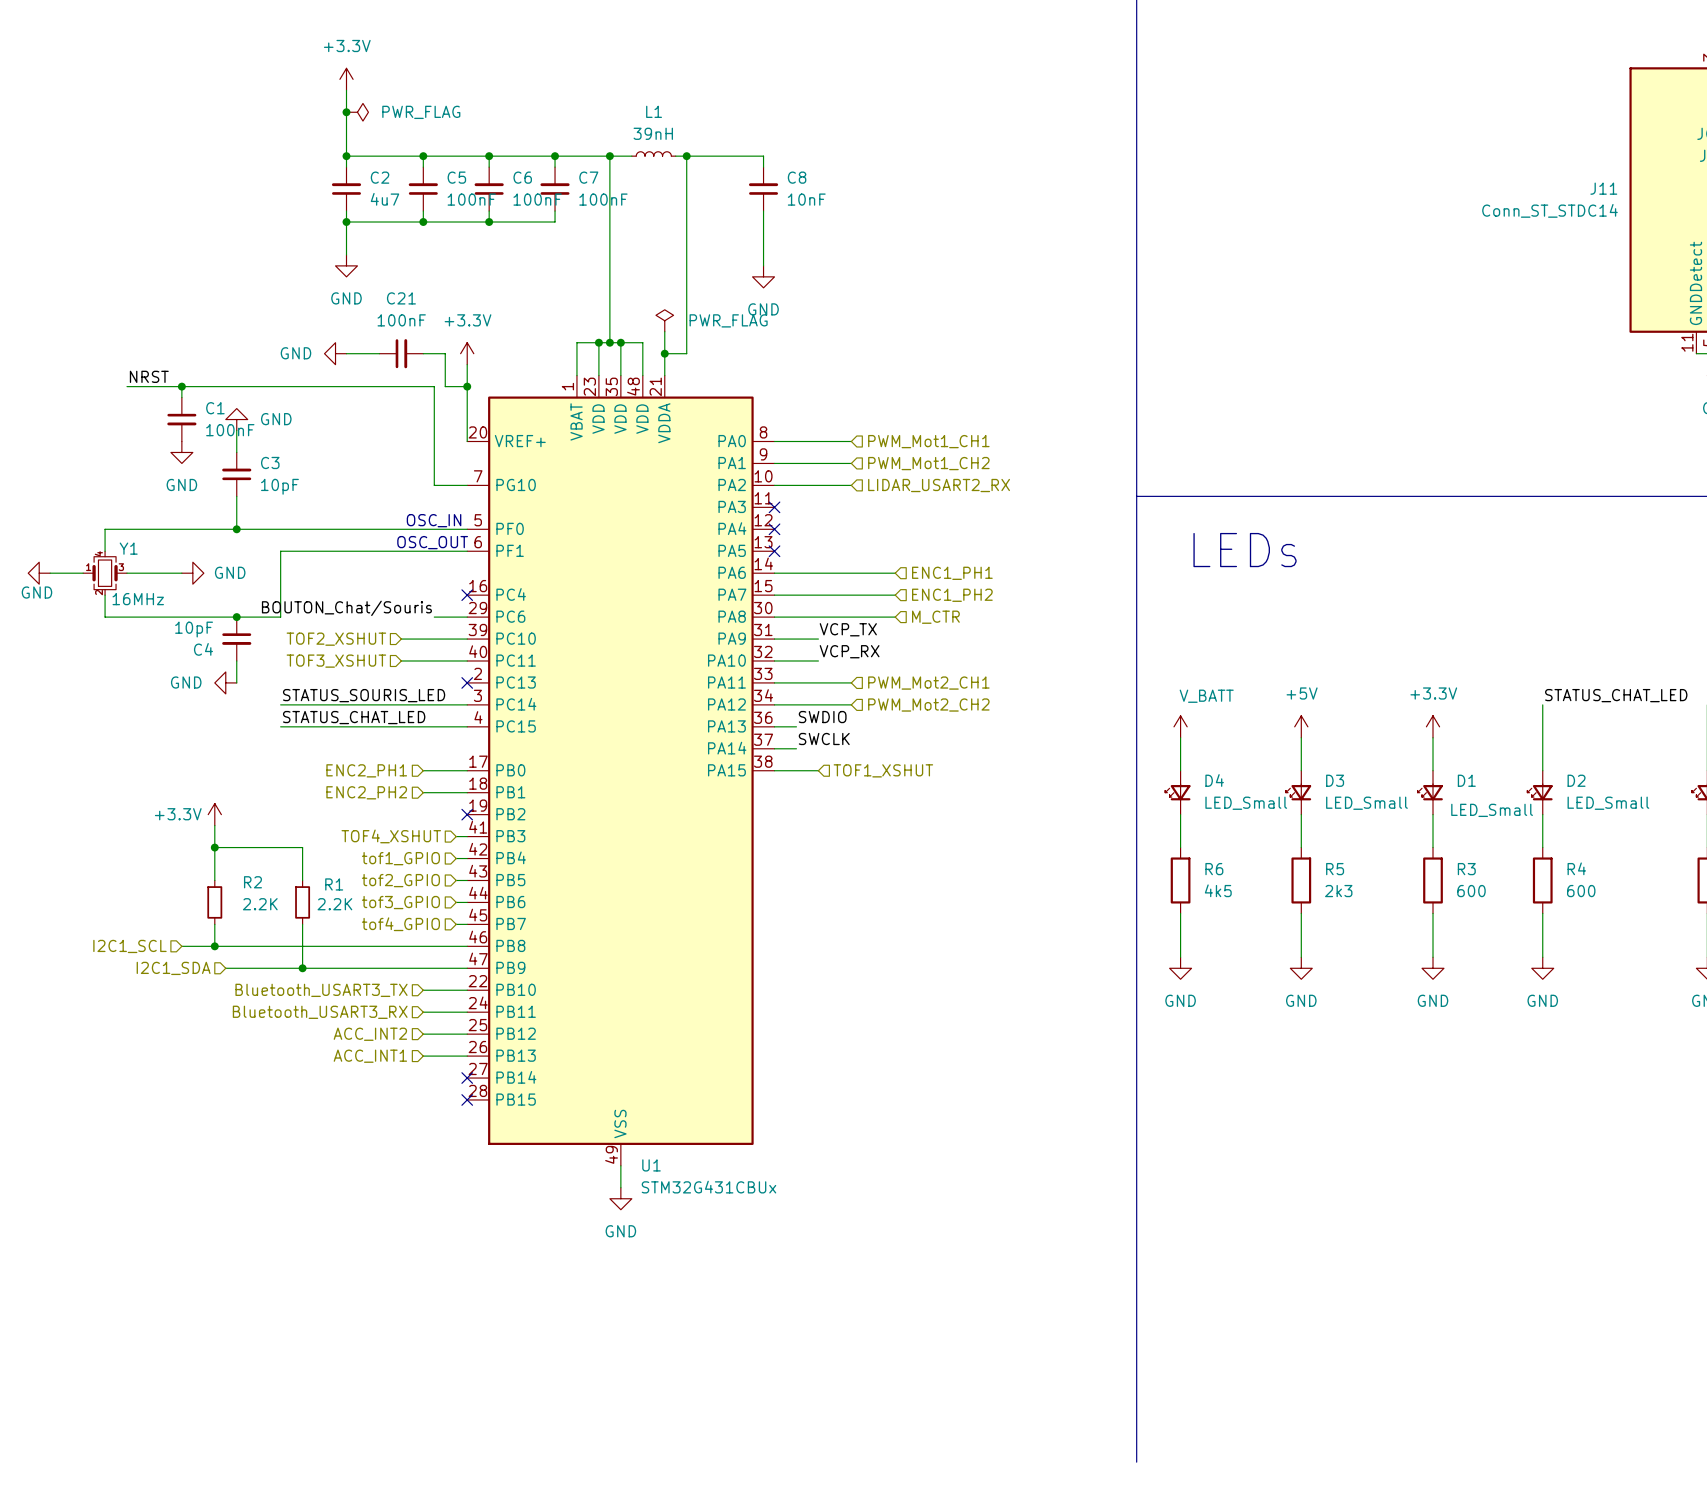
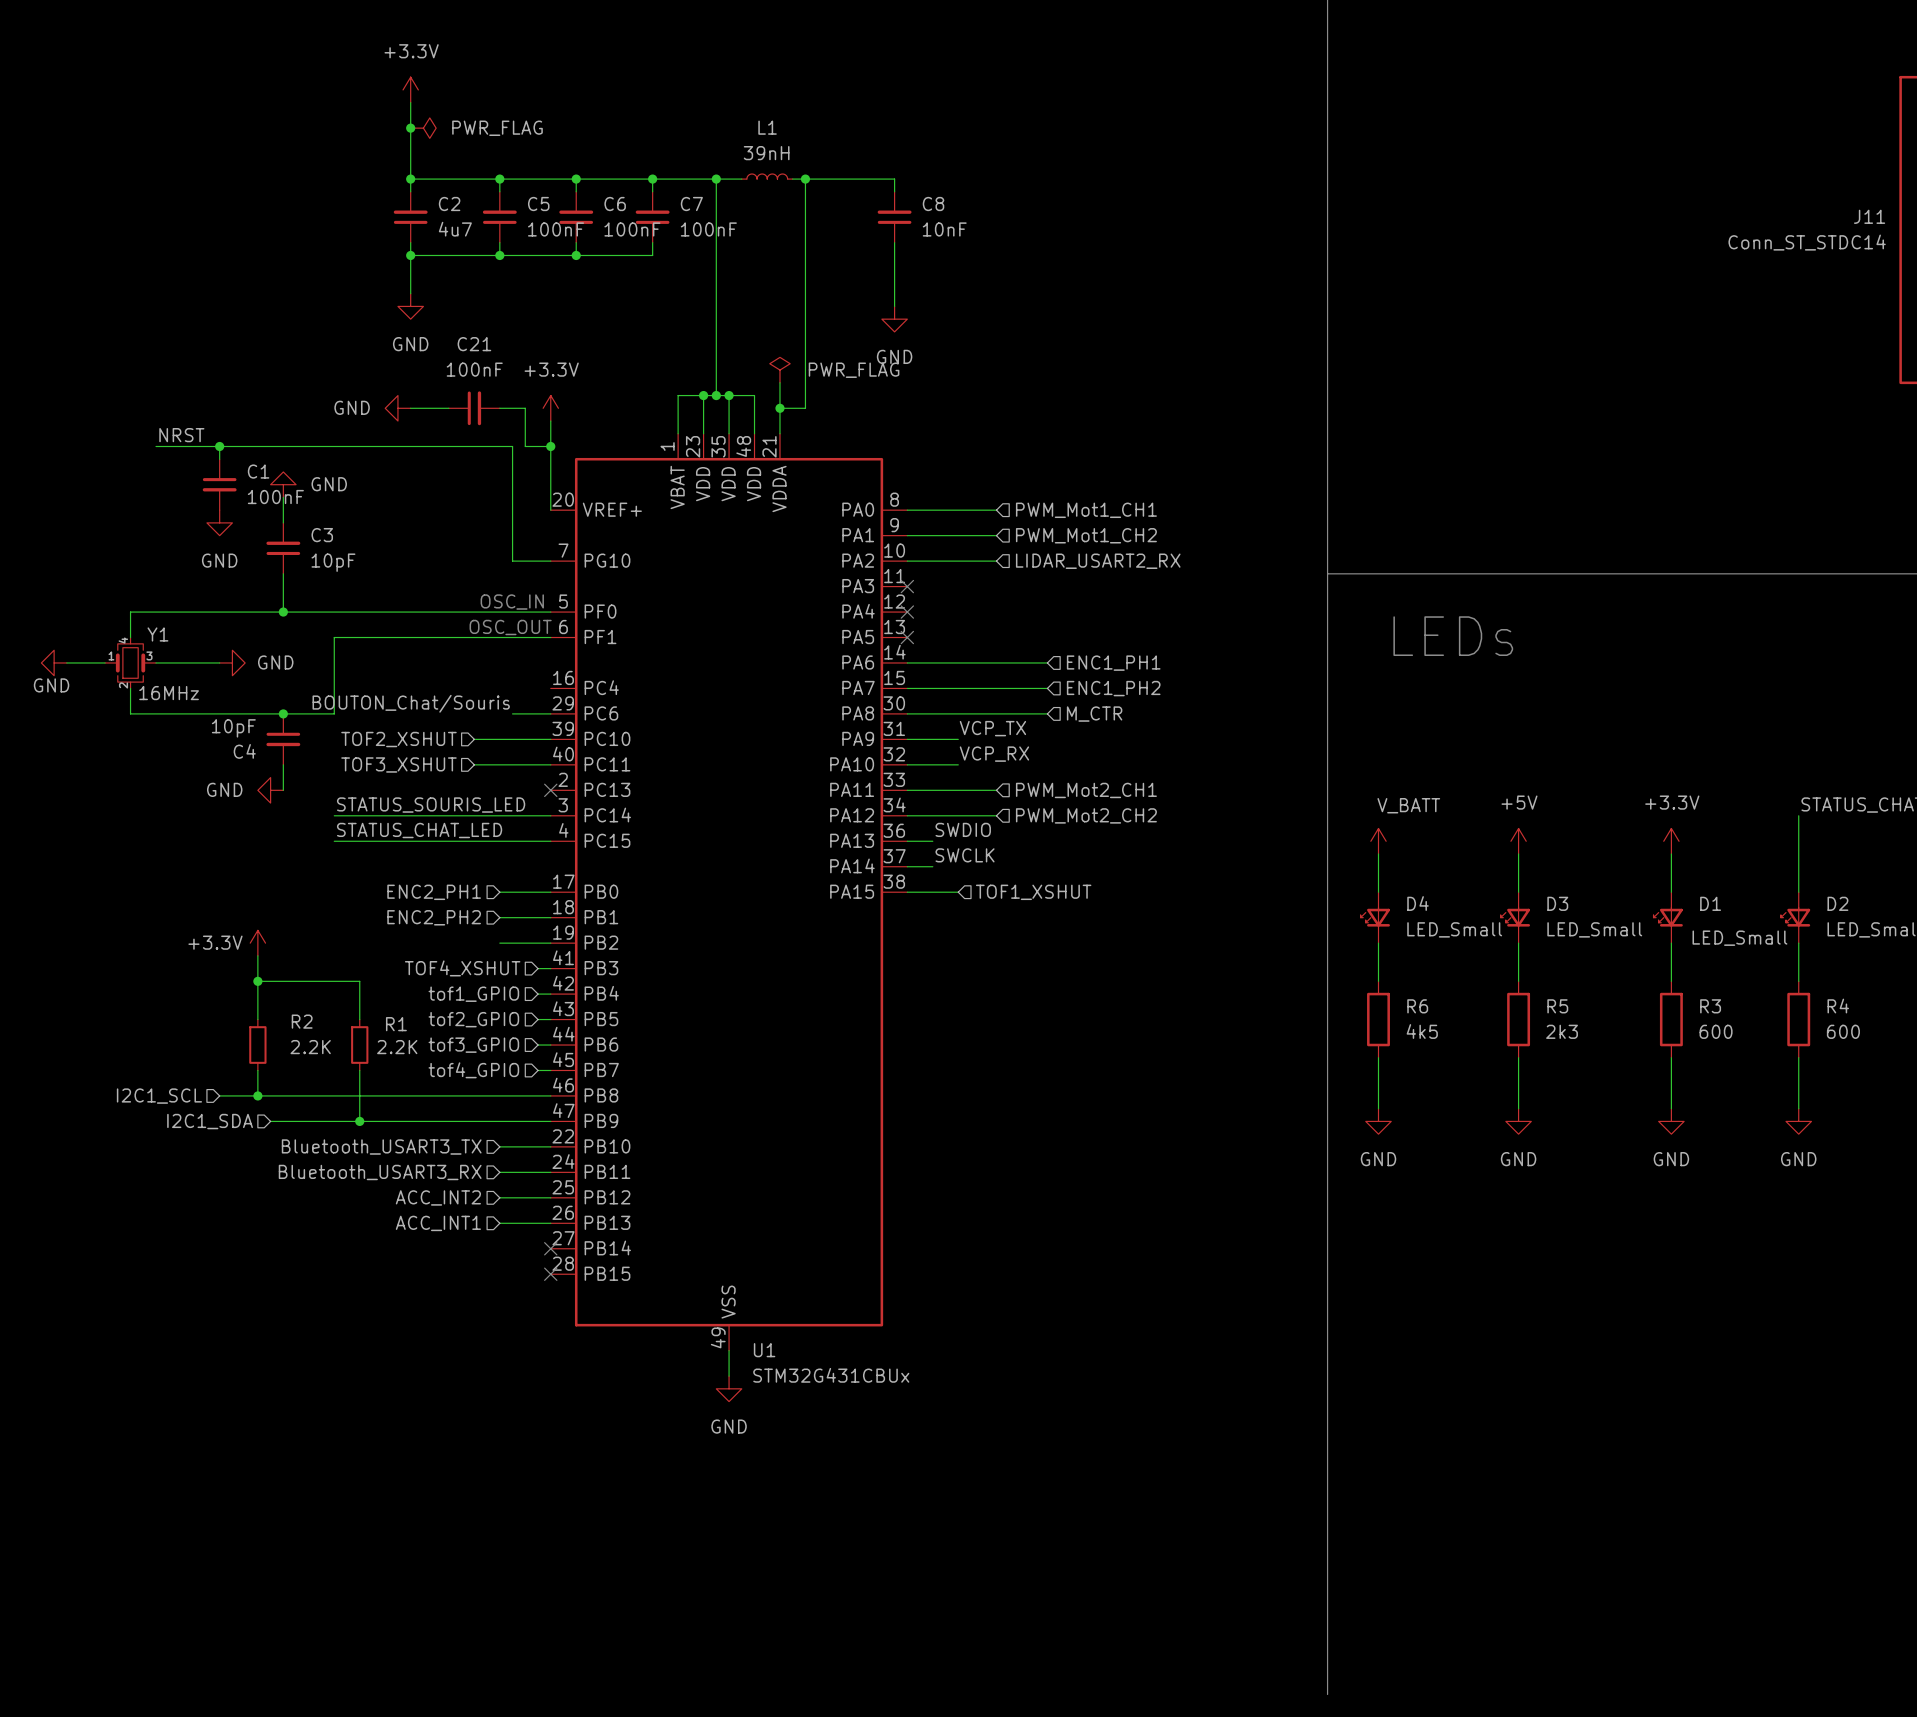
no-connect mark: (467, 595) -> none
wire: none -> (499, 943) (550, 943)
no-connect mark: (467, 814) -> none

